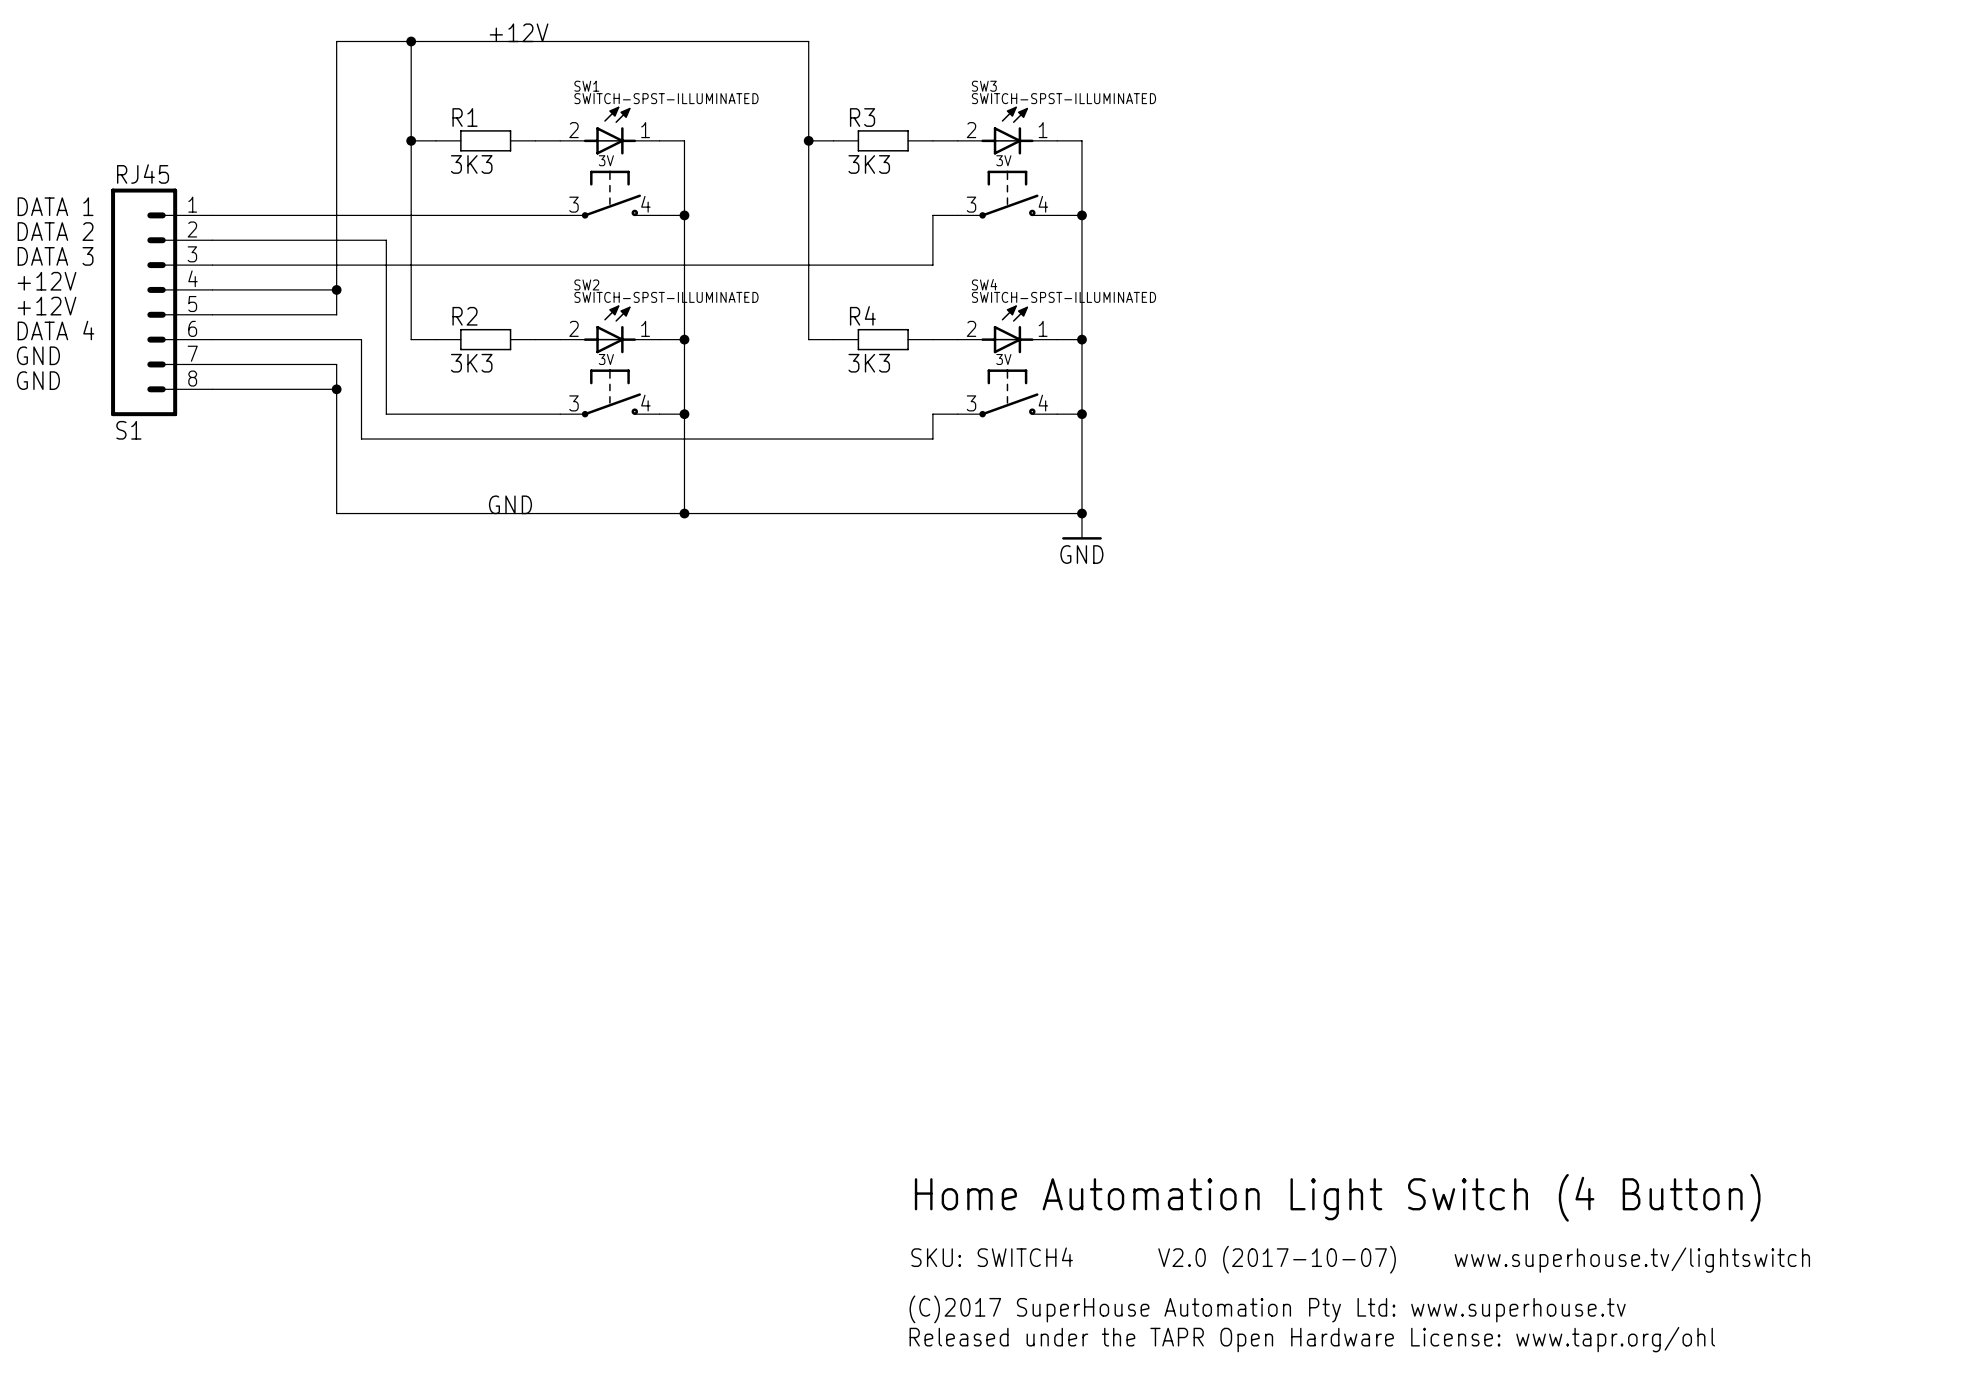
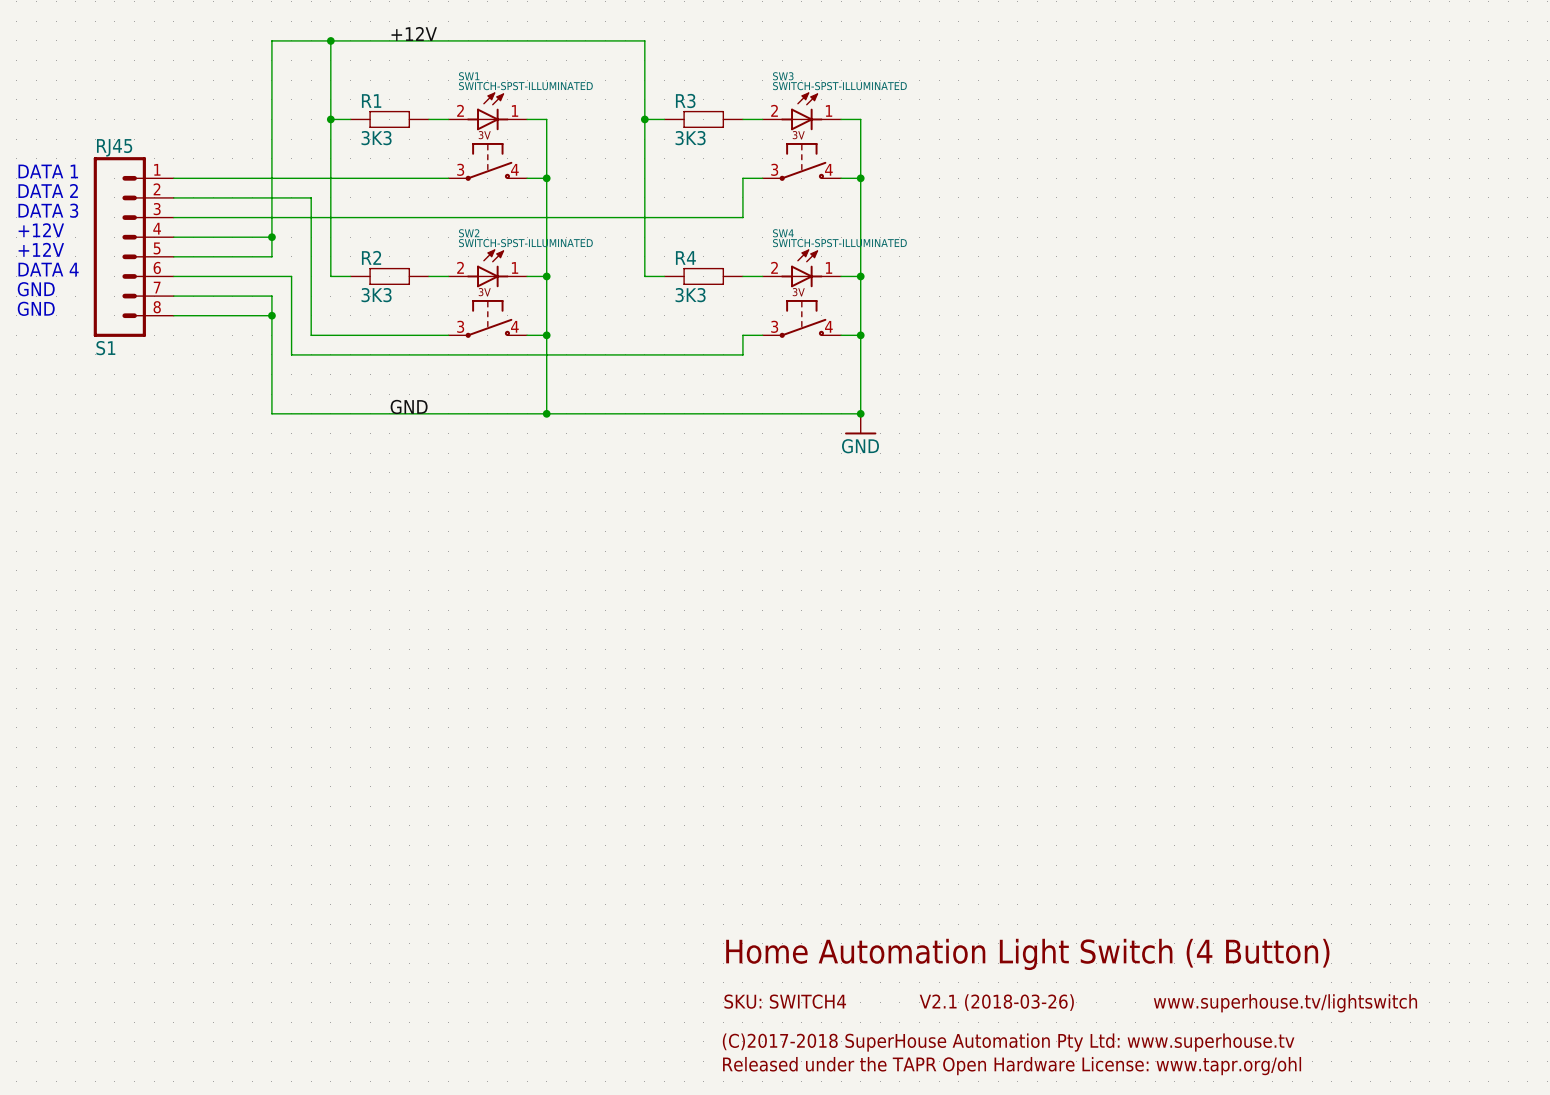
text: V2.0 (2017-10-07) (1277, 1259) -> V2.1 (2018-03-26) (996, 1002)
text: (C)2017 SuperHouse Automation Pty Ltd: www.superhouse.tv (1267, 1309) -> (C)2017-2018 SuperHouse Automation Pty Ltd: www.superhouse.tv (1008, 1042)

